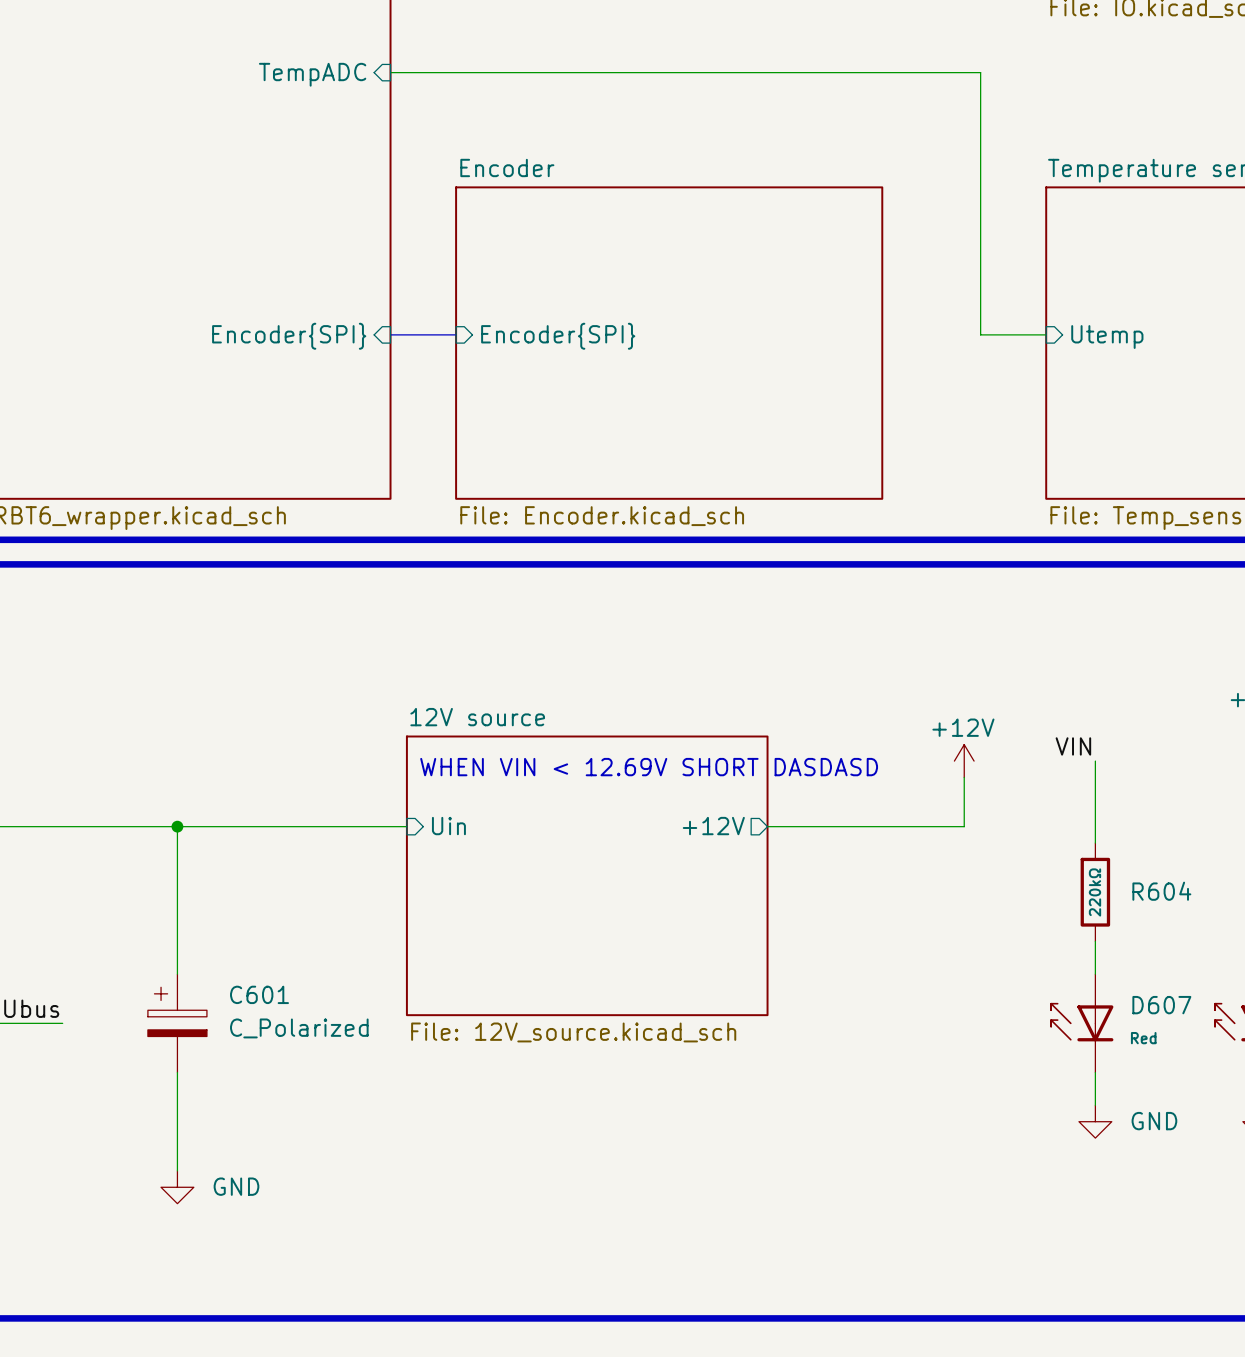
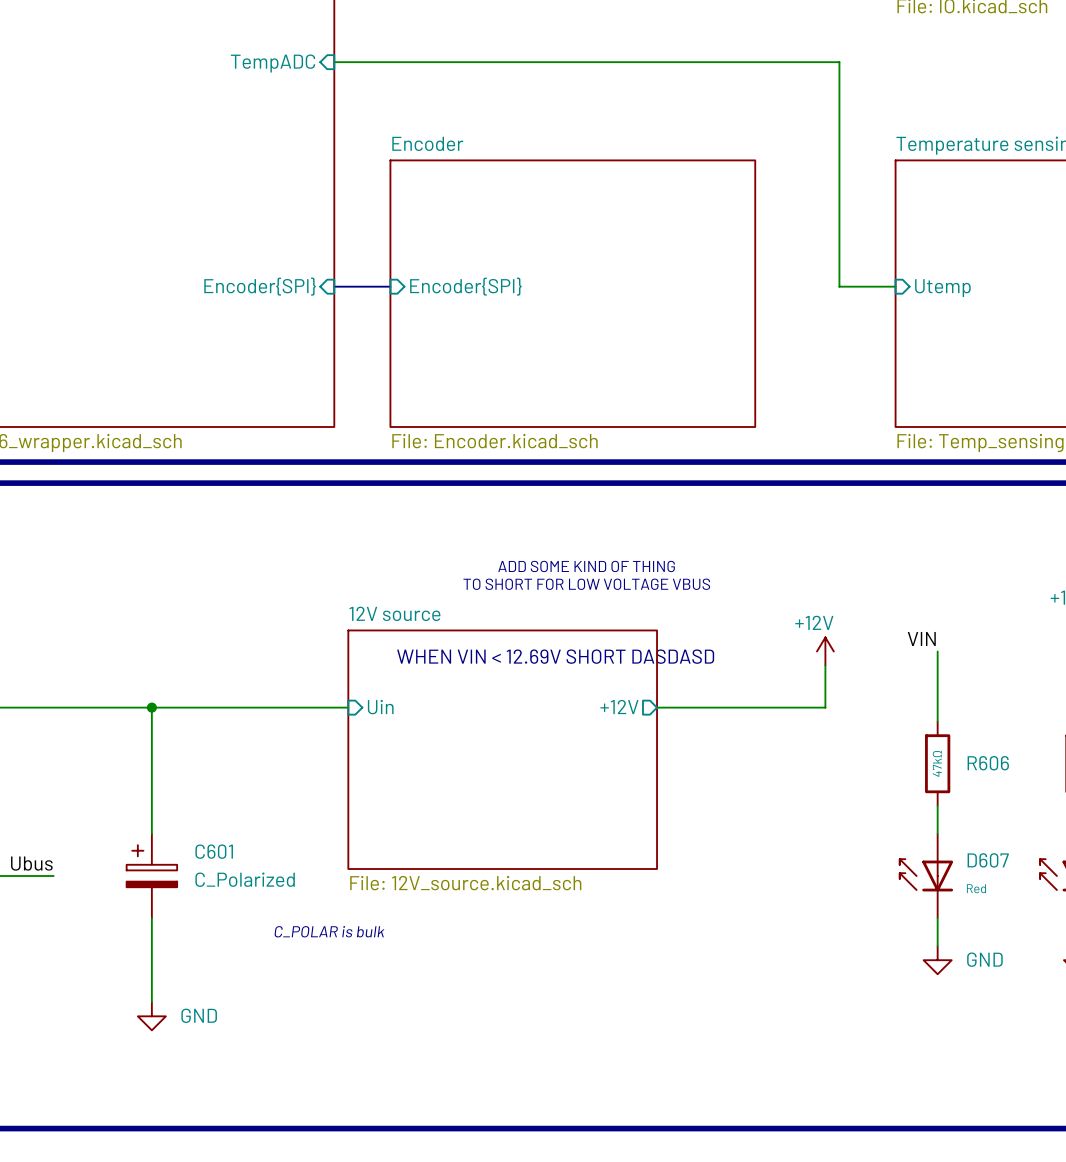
text: none -> ADD SOME KIND OF THING (586, 566)
text: none -> TO SHORT FOR LOW VOLTAGE VBUS (586, 584)
R604 name: R604 (1161, 891) -> R606 (988, 763)
R604 value: 220kΩ (1094, 892) -> 47kΩ (937, 763)
text: none -> C_POLAR is bulk (329, 931)

